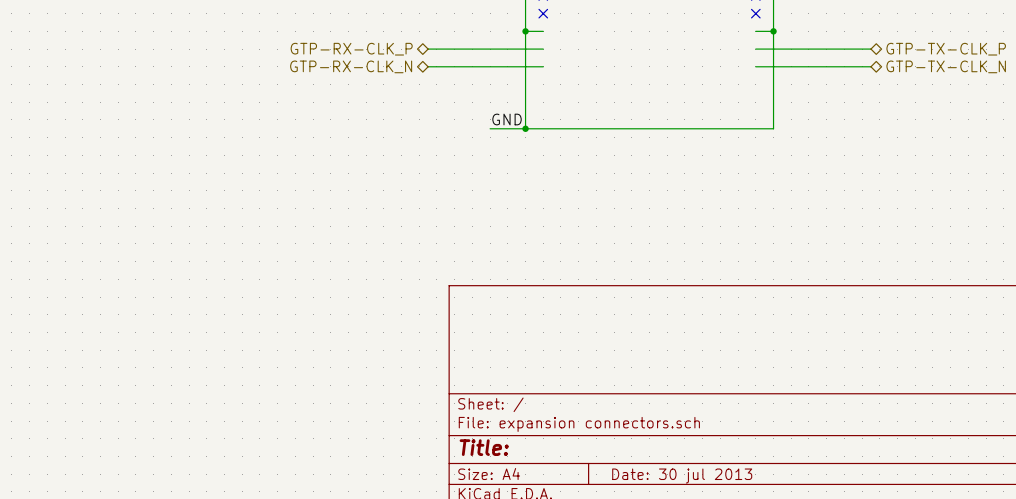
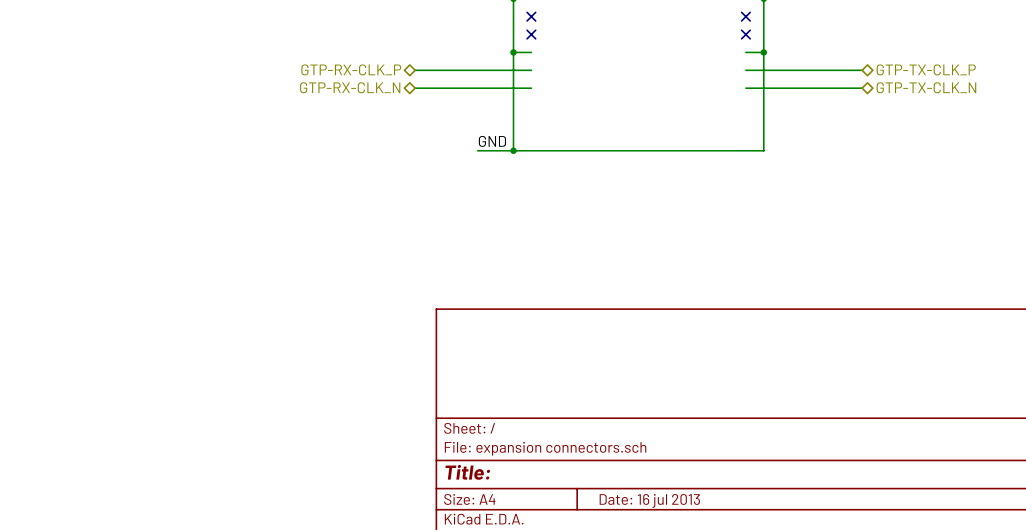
title block: Date: 30 jul 2013 (682, 476) -> Date: 16 jul 2013 (649, 500)

